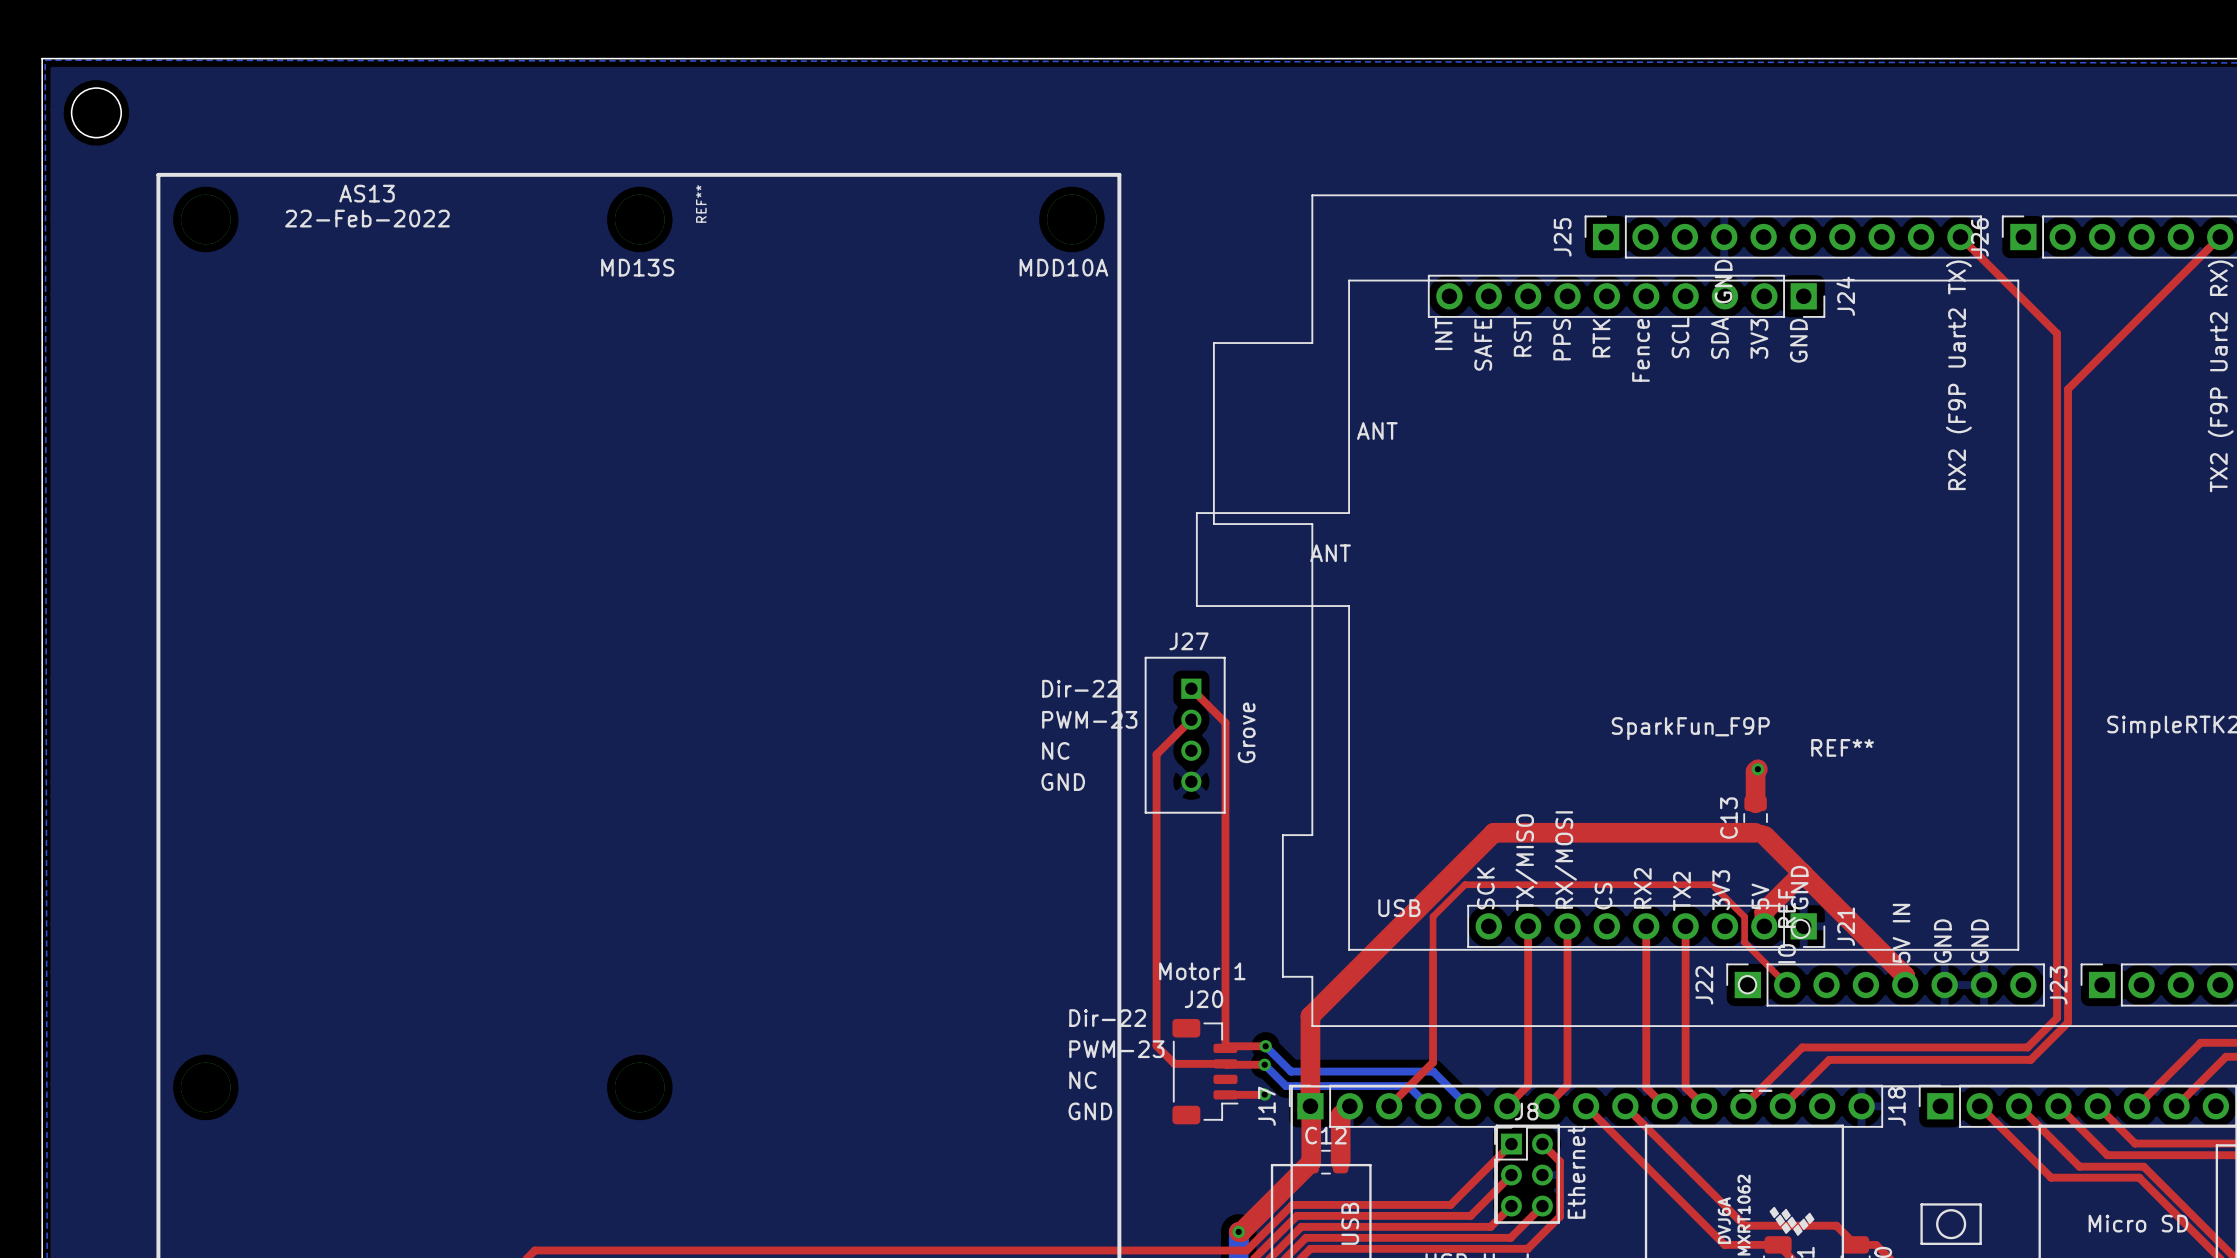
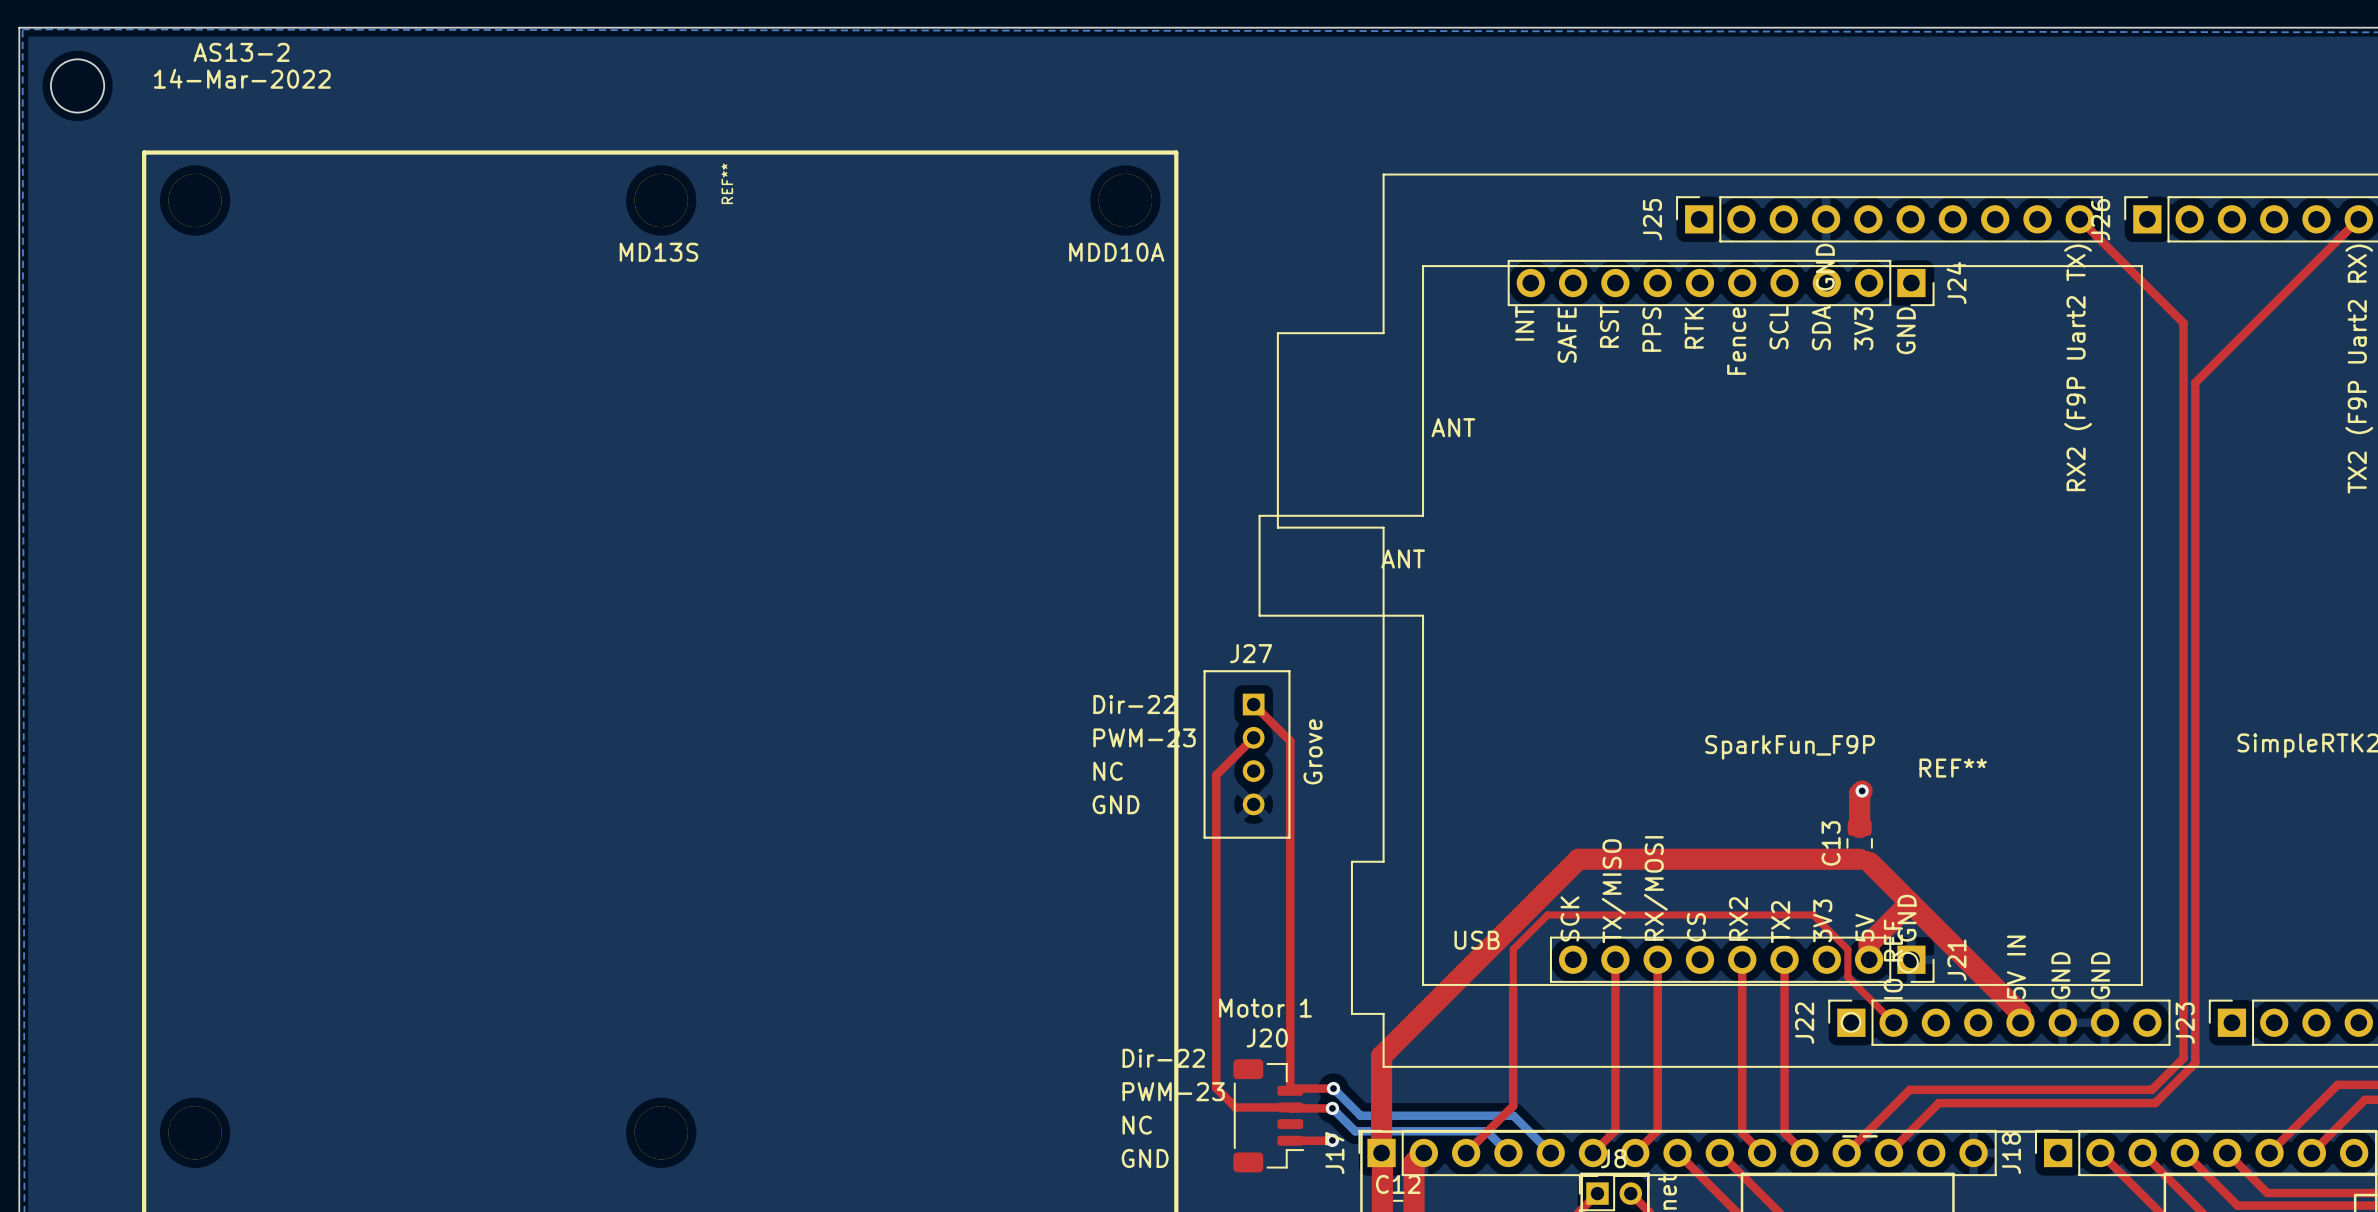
text: none -> AS13-2 (241, 52)
text: none -> 14-Mar-2022 (242, 78)
text: AS13 (367, 193) -> none
text: 22-Feb-2022 (367, 218) -> none

